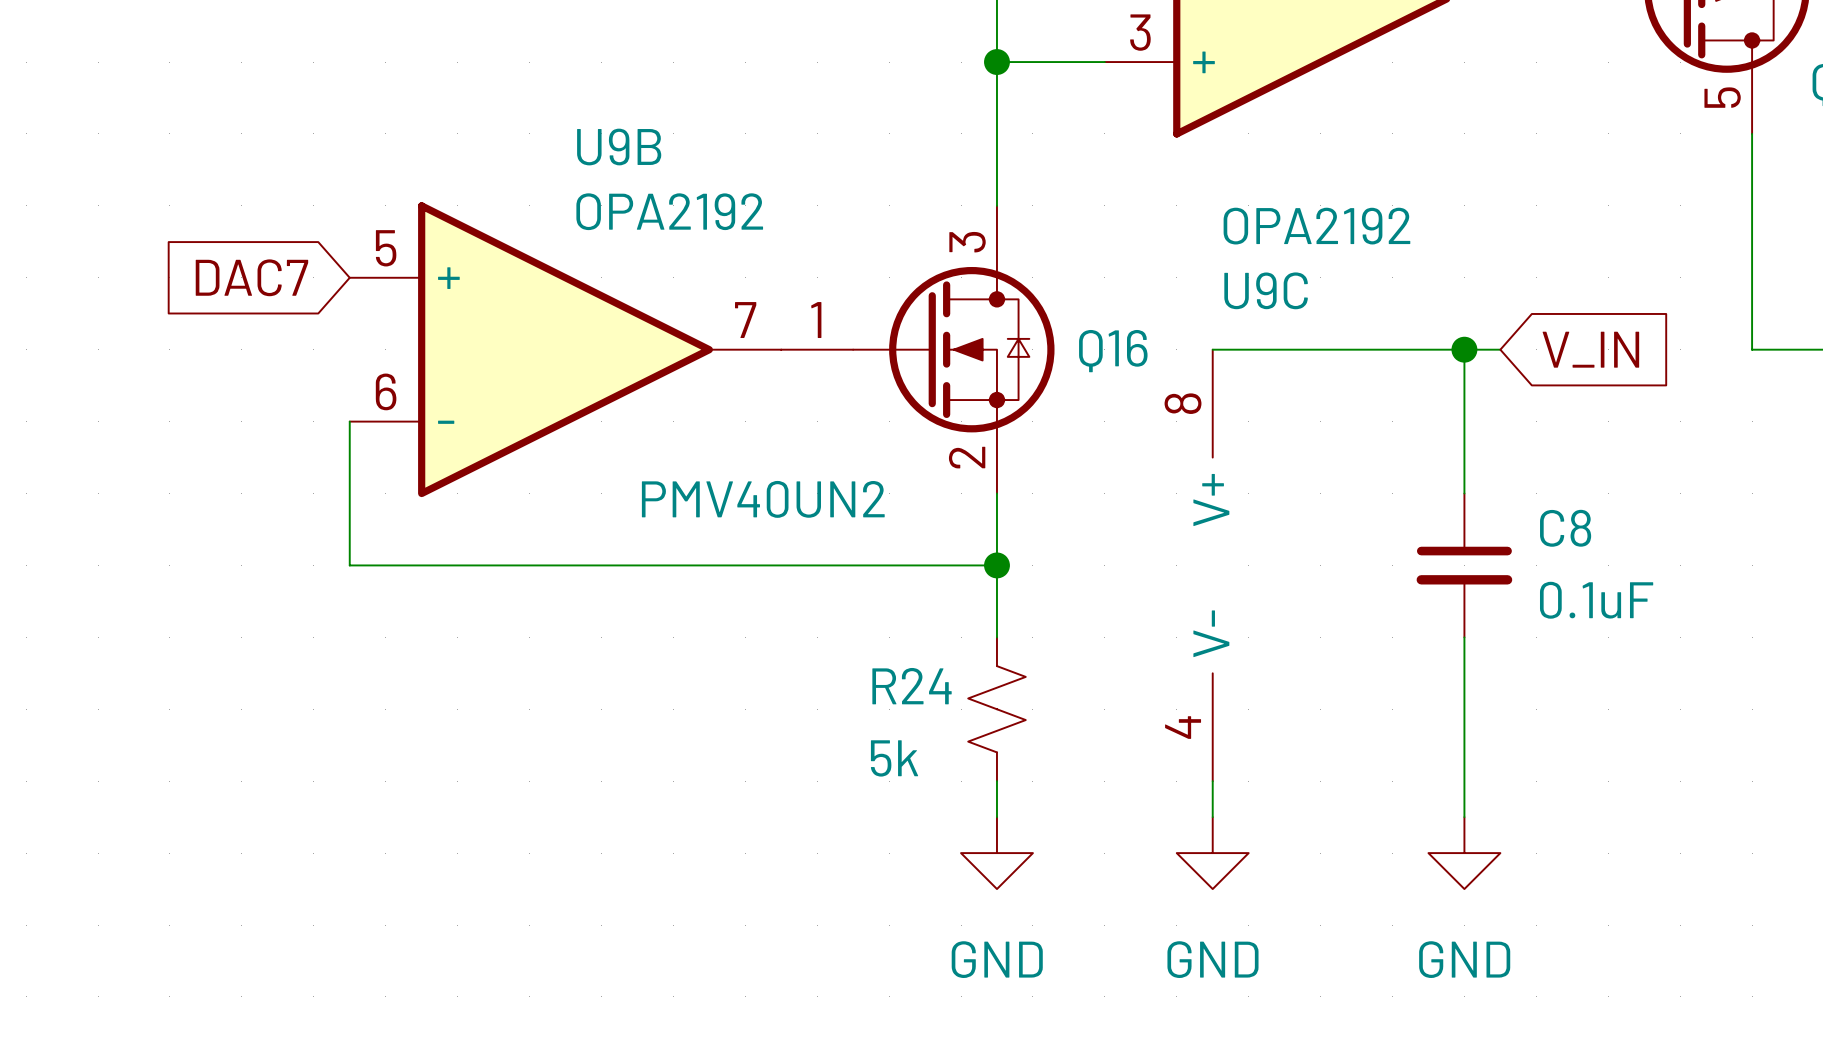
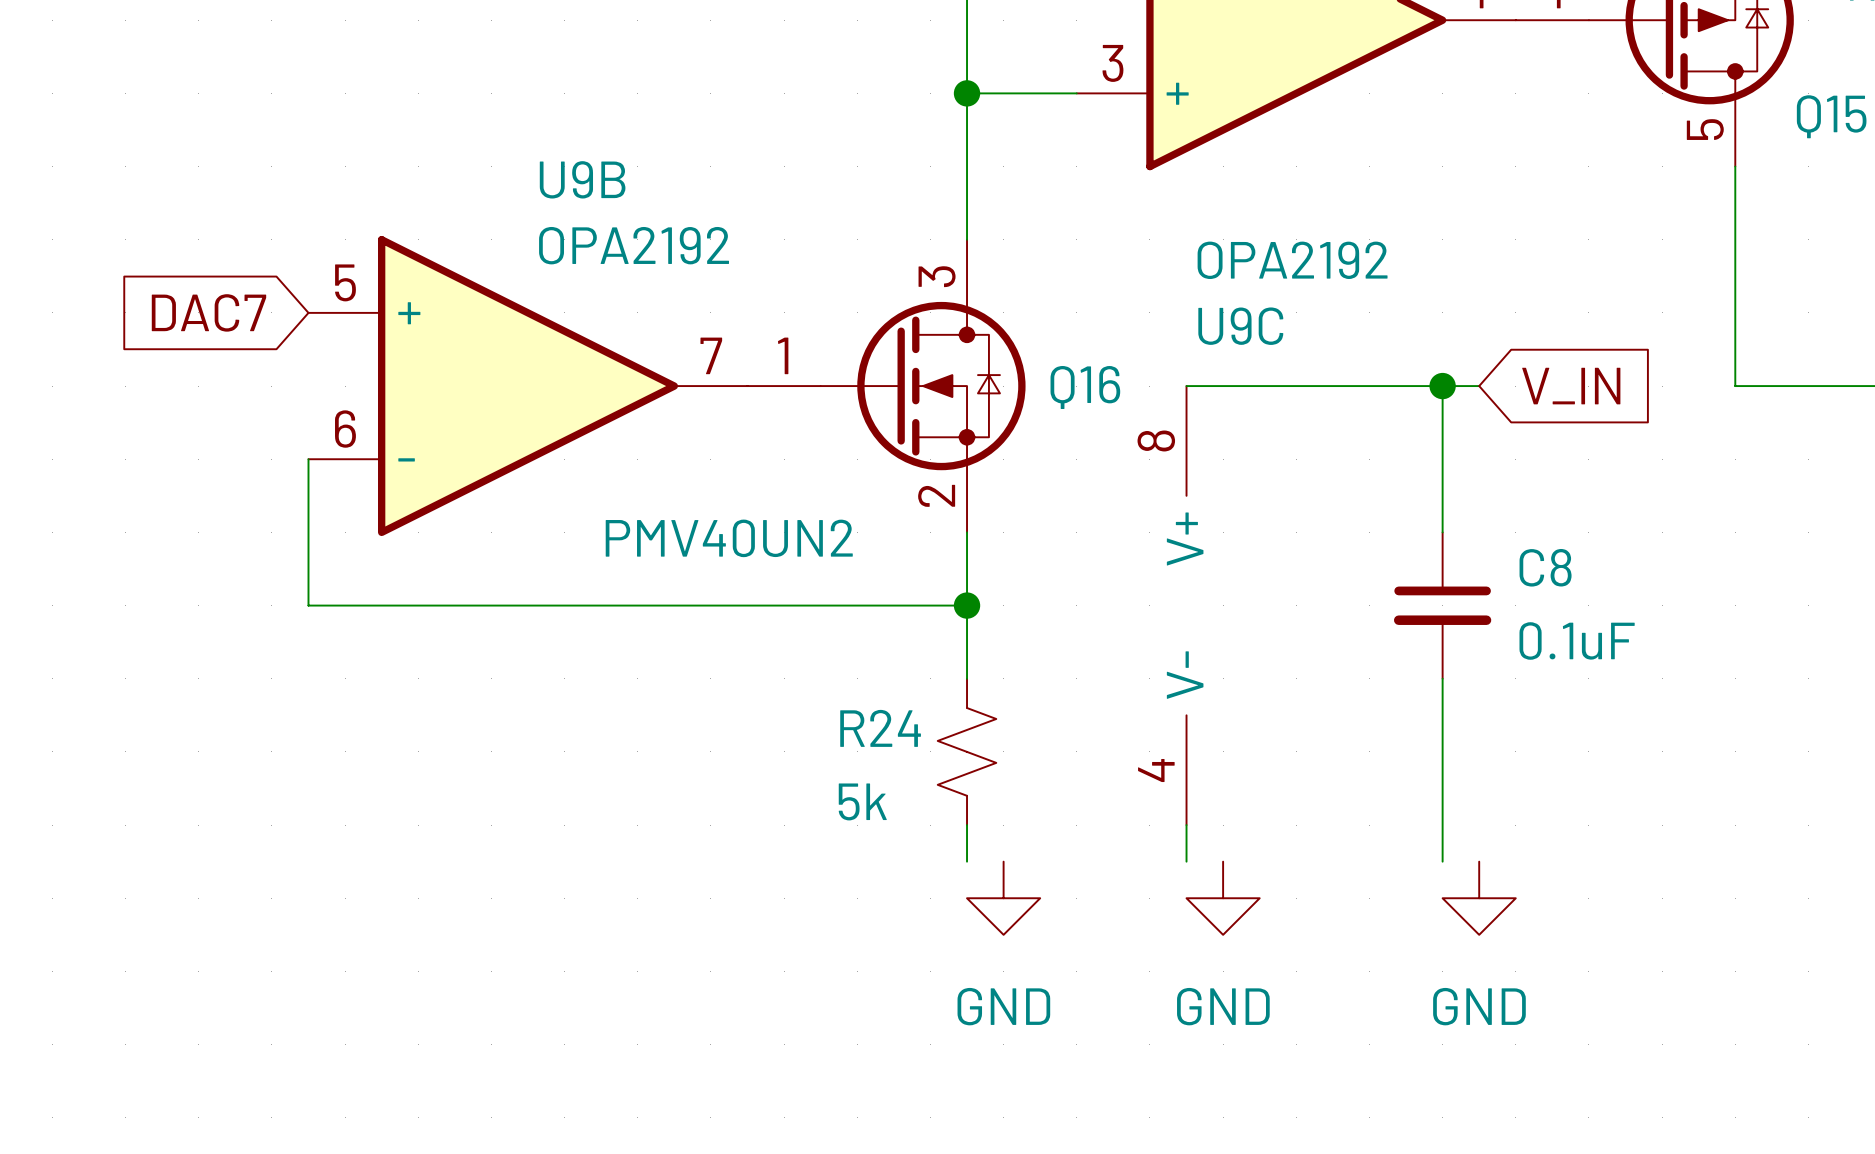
power symbol position: GND (996, 853) -> GND (1003, 898)
power symbol position: GND (1212, 853) -> GND (1223, 898)
power symbol position: GND (1464, 853) -> GND (1479, 898)

